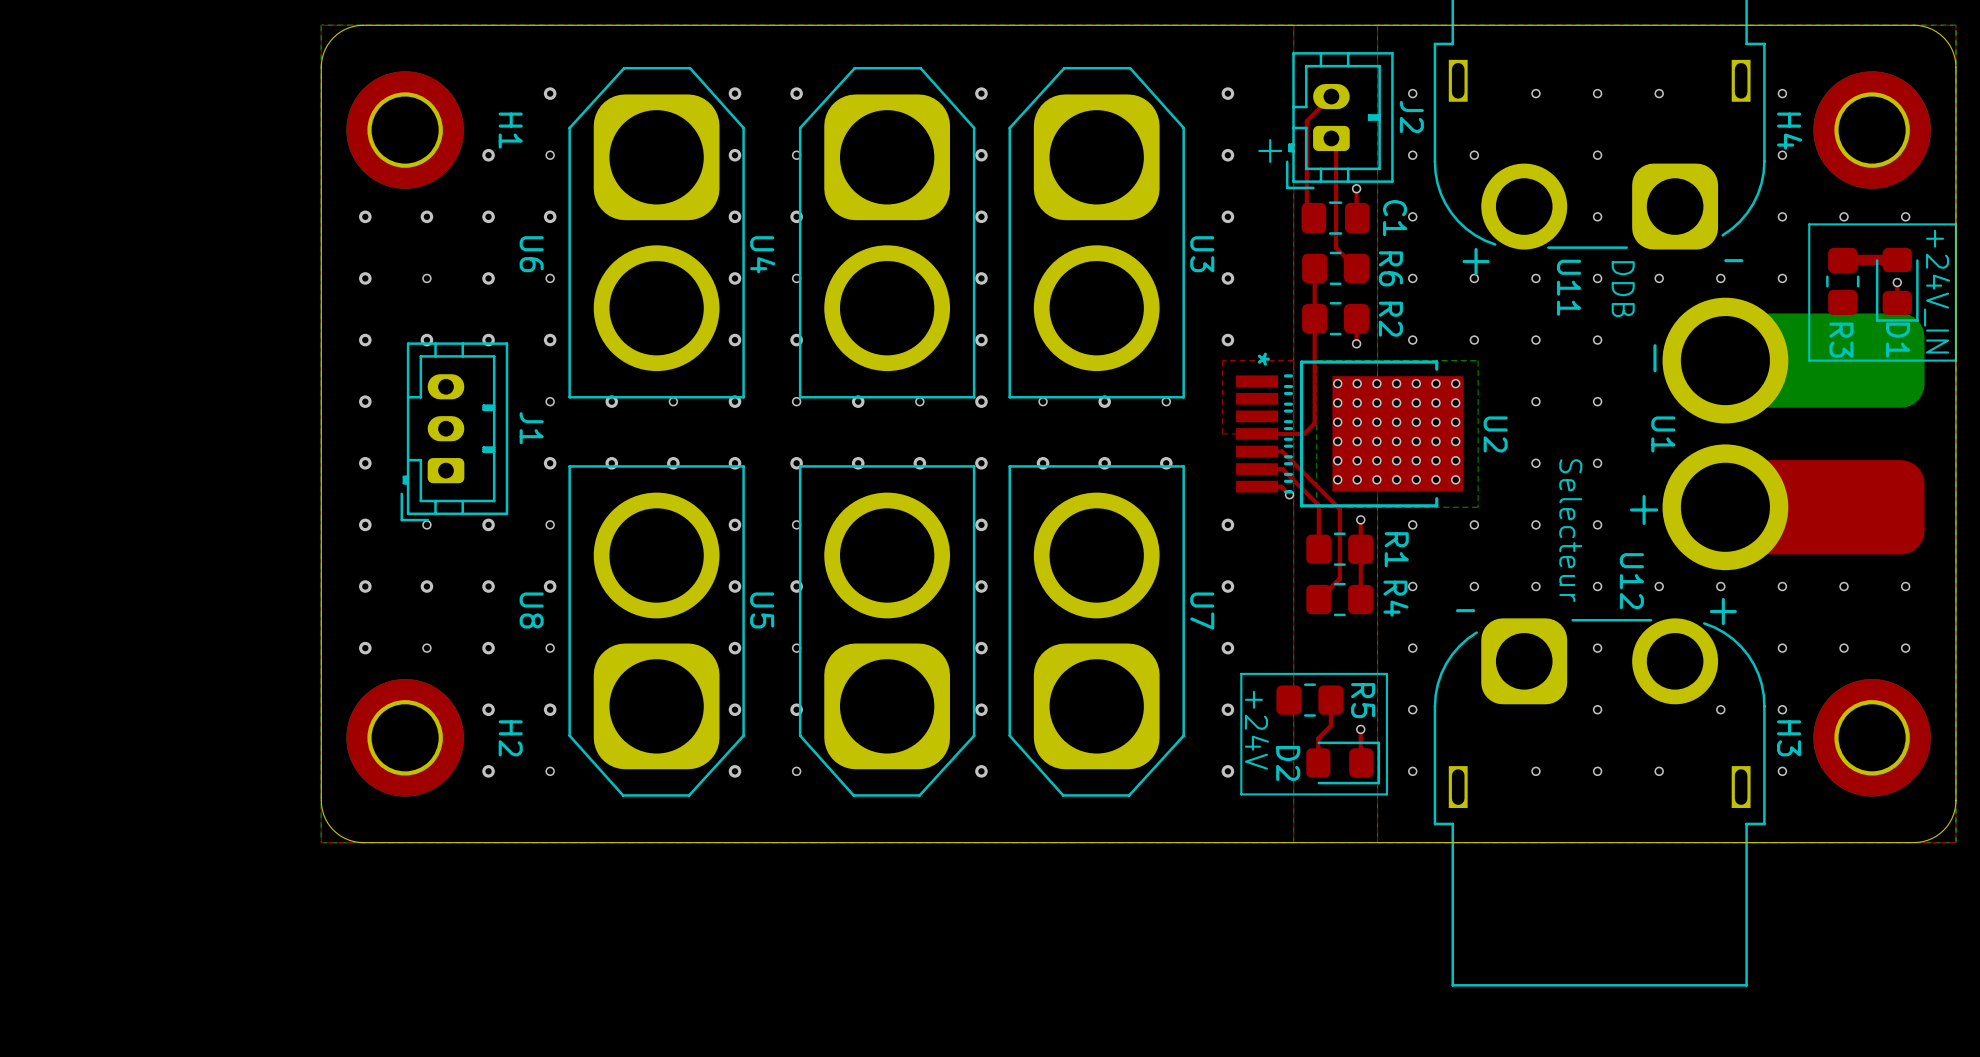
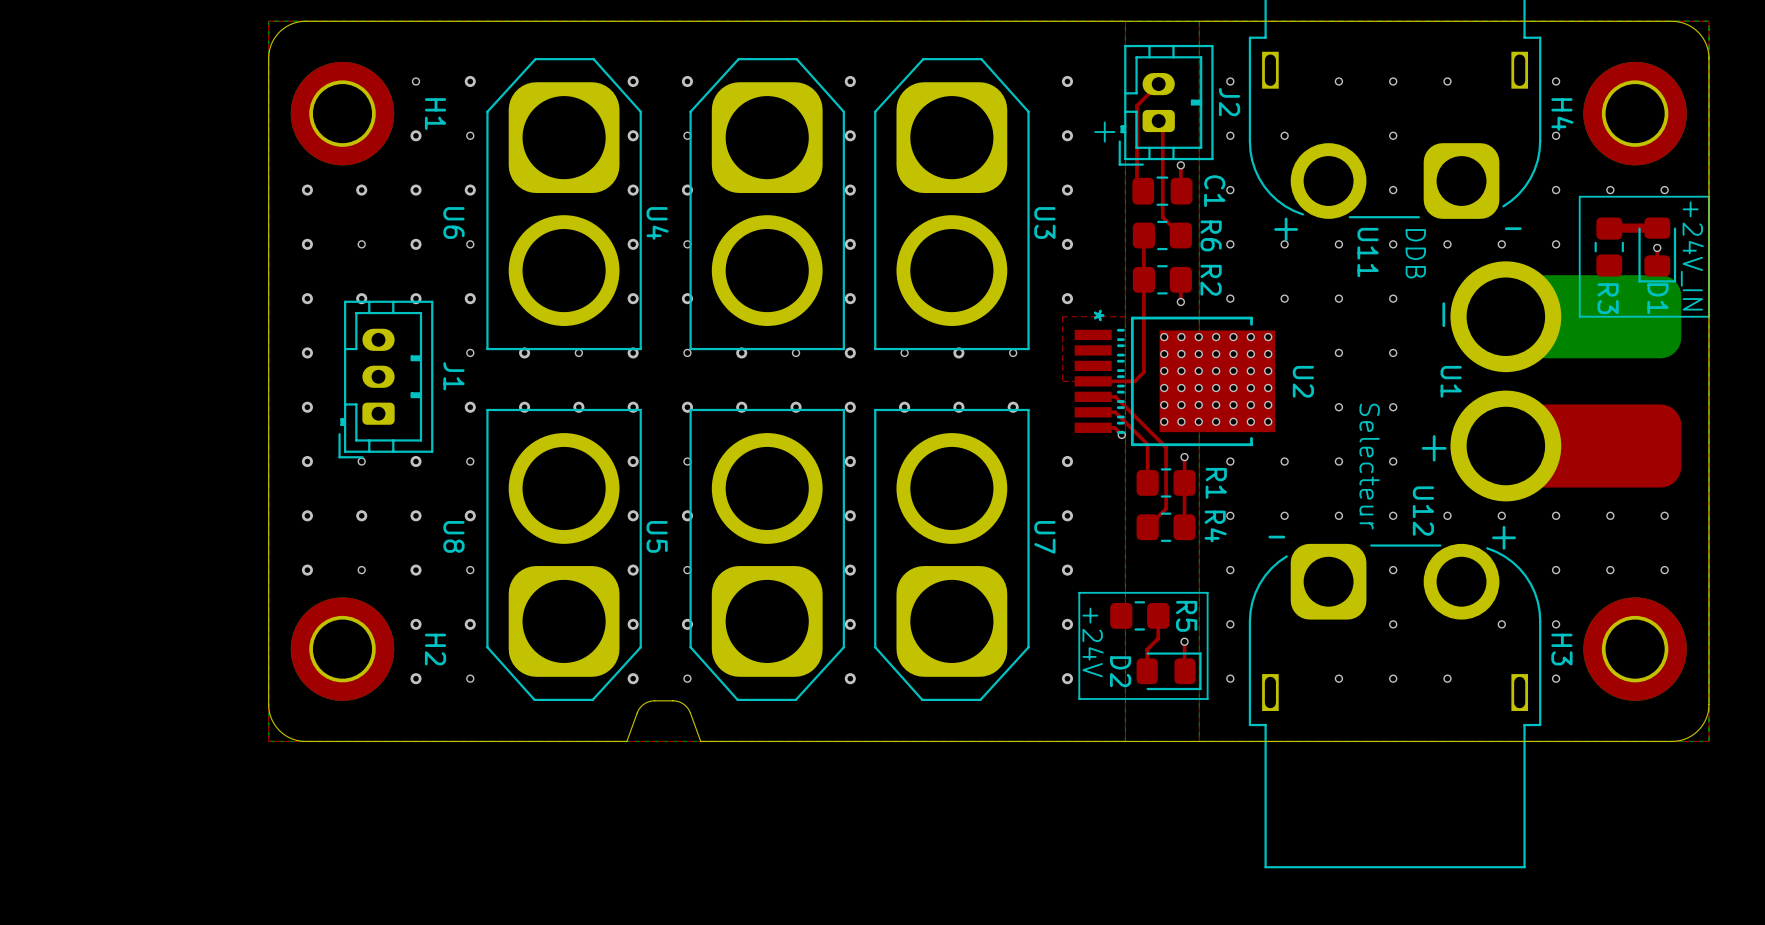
via: none -> (416, 81)
bottom zone outline: (1316, 360) (1478, 360) (1478, 507) (1316, 507) (1316, 360) -> none
board edge: (727, 842) (811, 842) -> (626, 741) (639, 708) (645, 702) (654, 700) (675, 700) (685, 705) (690, 712) (700, 741)

